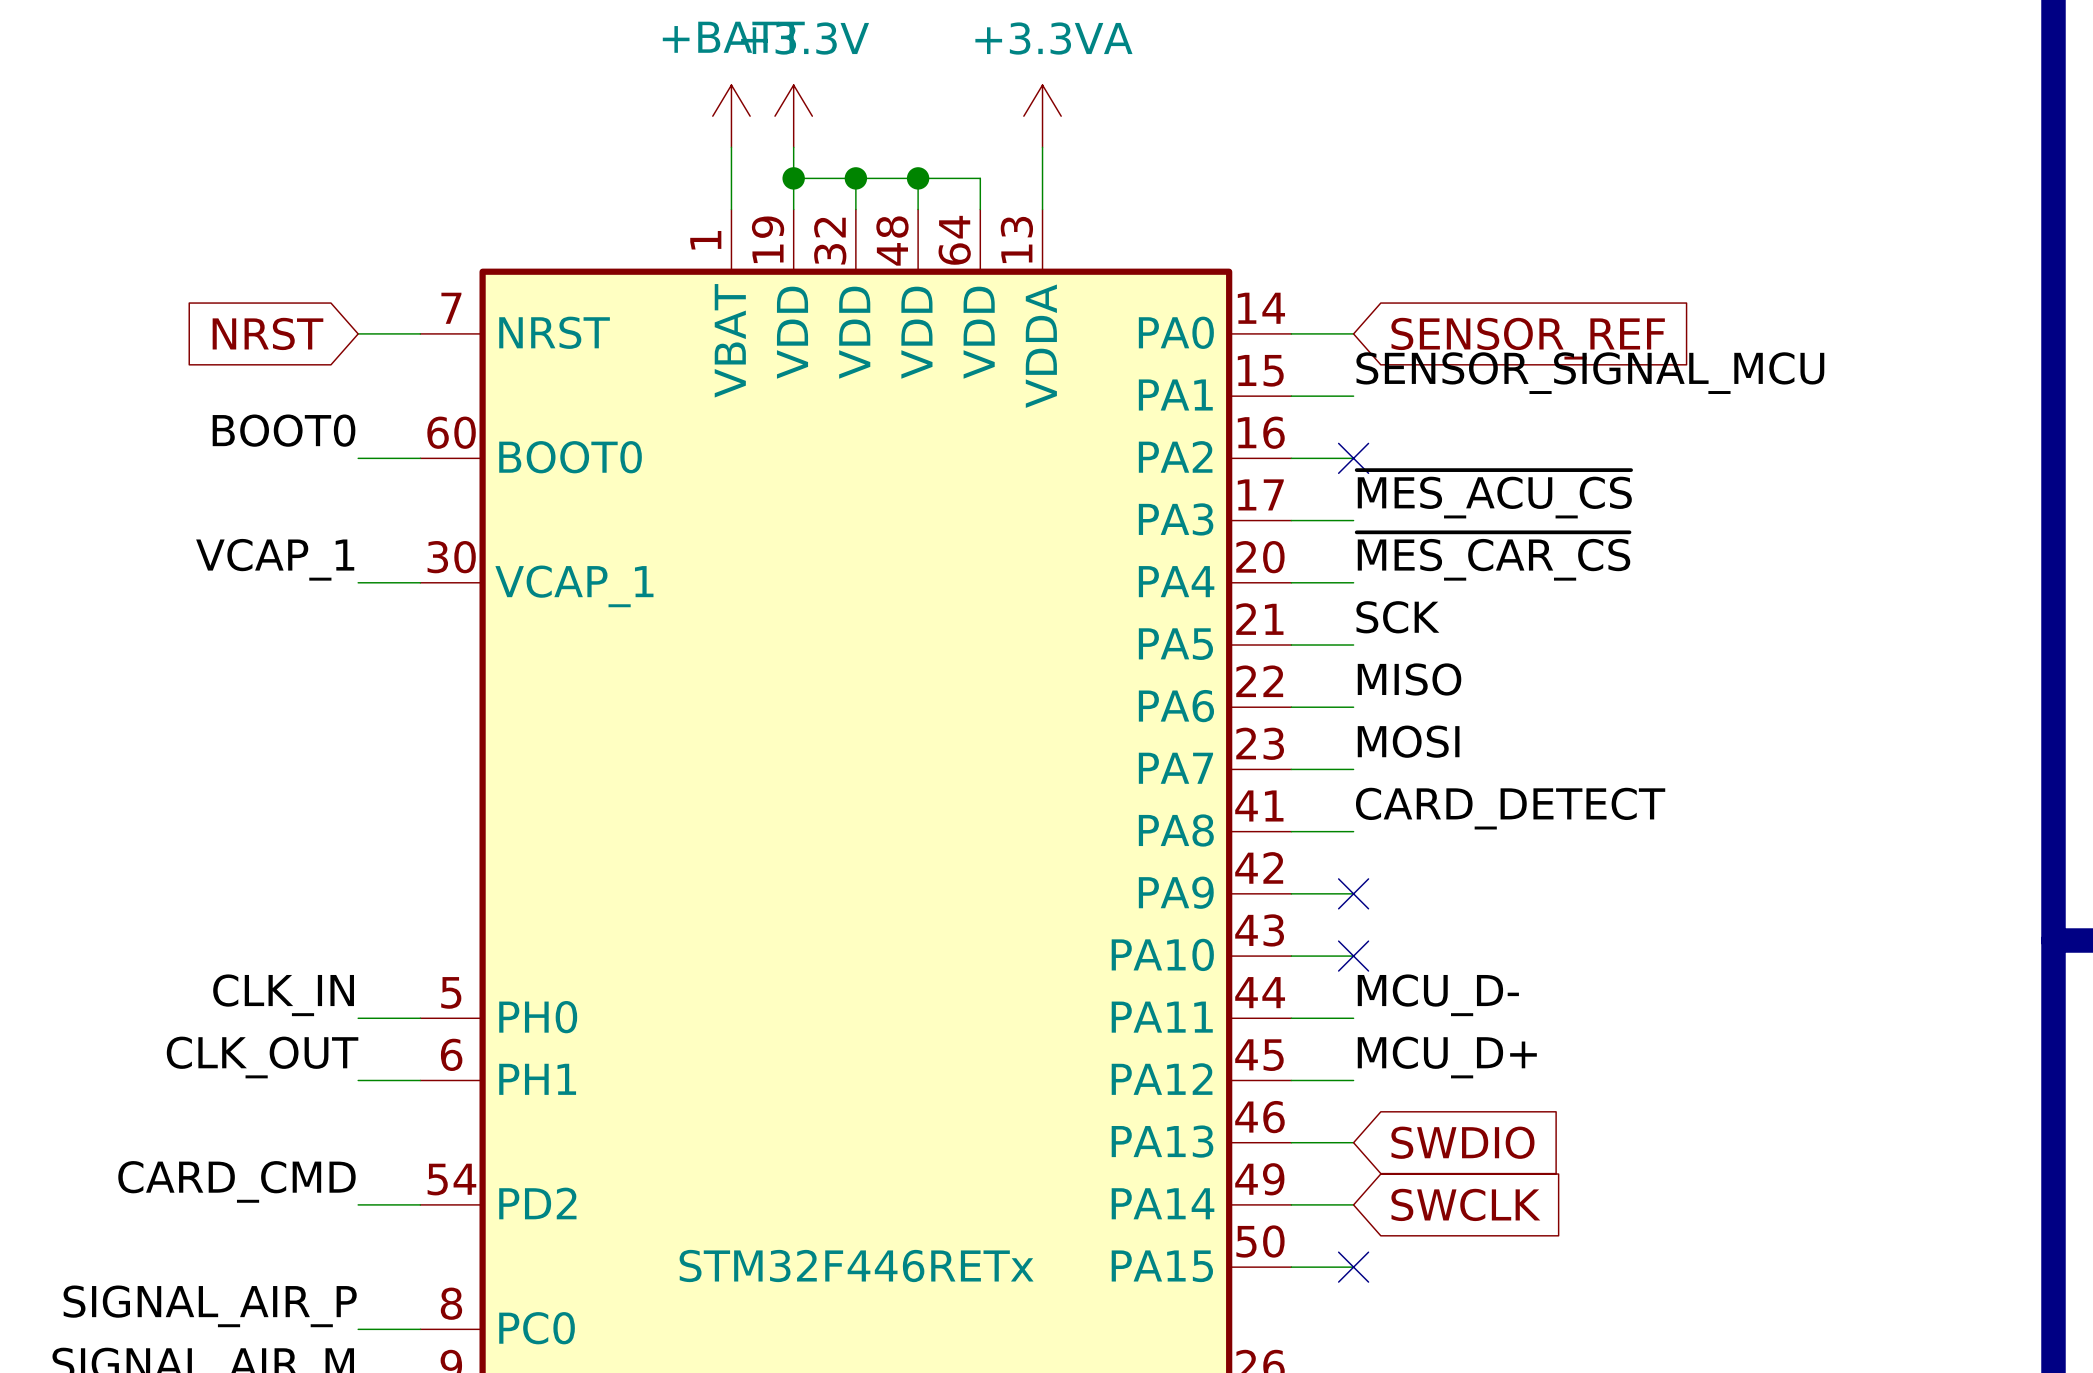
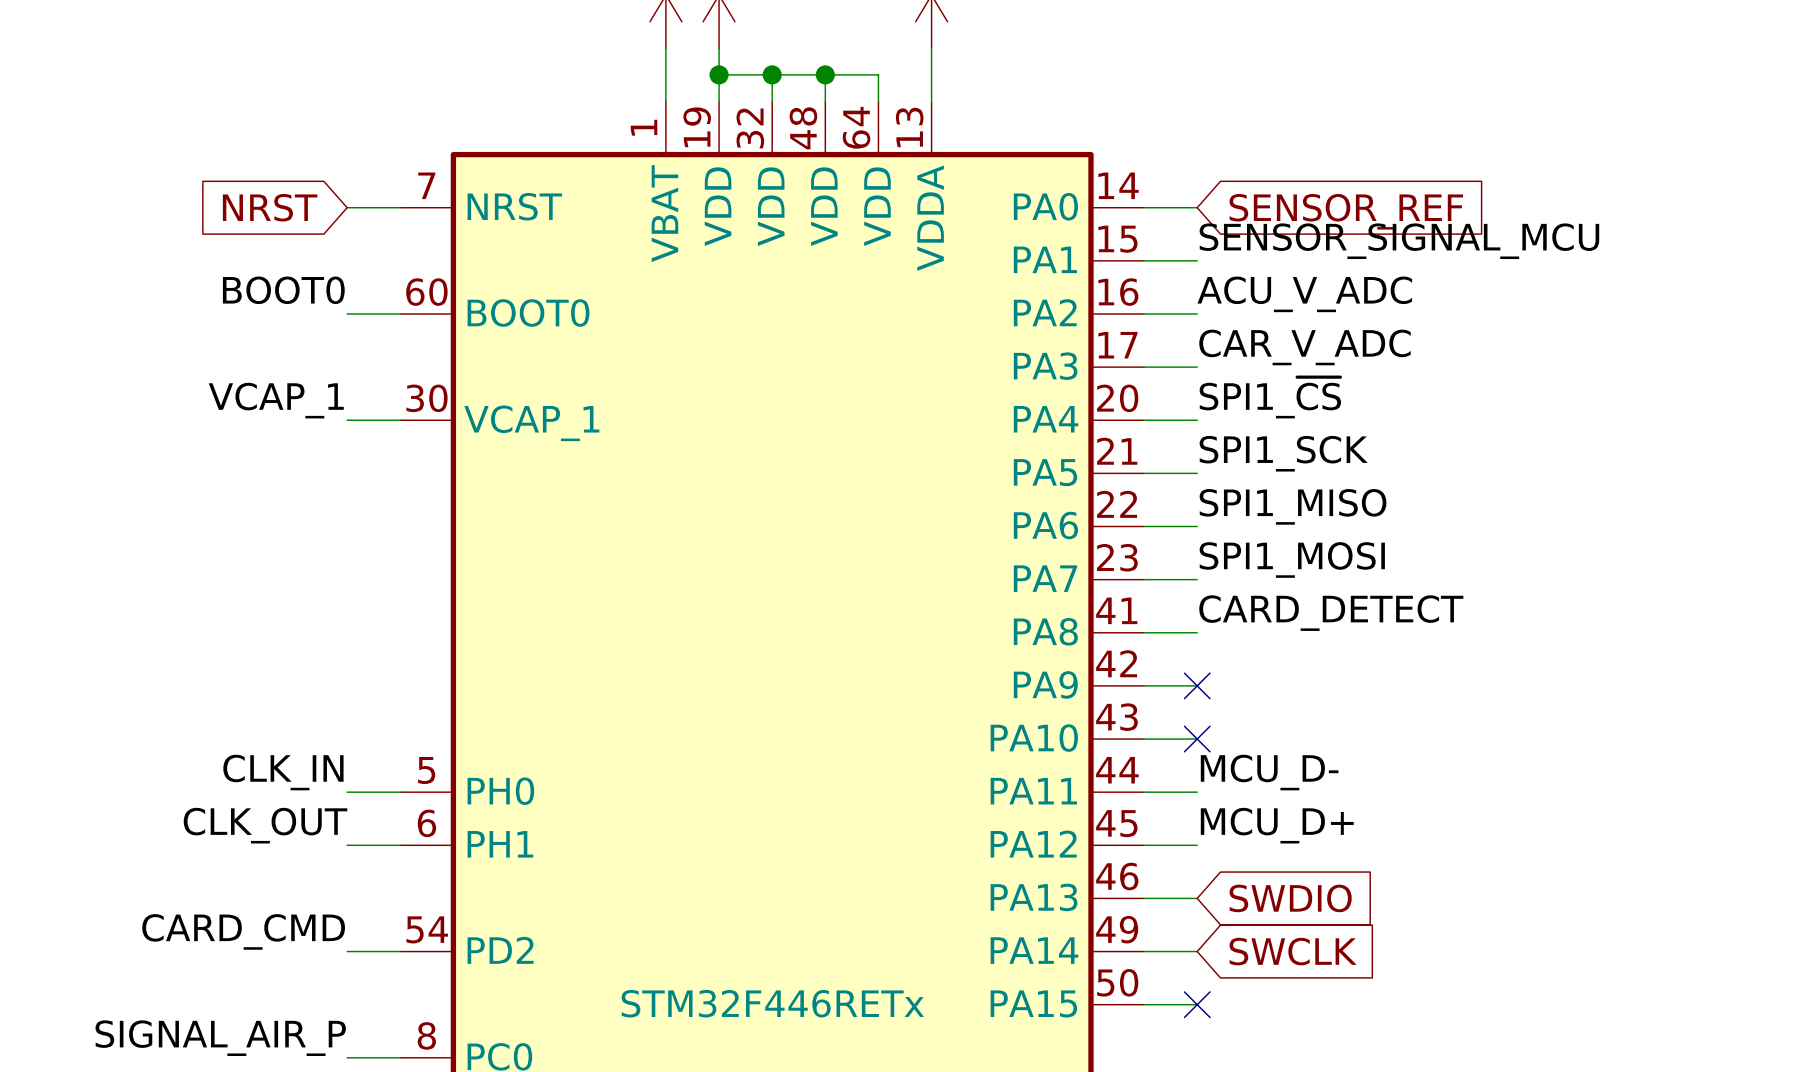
label: none -> ACU_V_ADC (1304, 294)
no-connect mark: (1353, 458) -> none
label: ~{MES_ACU_CS} (1494, 494) -> CAR_V_ADC (1305, 347)
label: ~{MES_CAR_CS} (1493, 556) -> SPI1_~{CS} (1270, 397)
label: SCK (1397, 617) -> SPI1_SCK (1283, 453)
label: MISO (1409, 679) -> SPI1_MISO (1293, 506)
label: MOSI (1408, 741) -> SPI1_MOSI (1292, 559)

